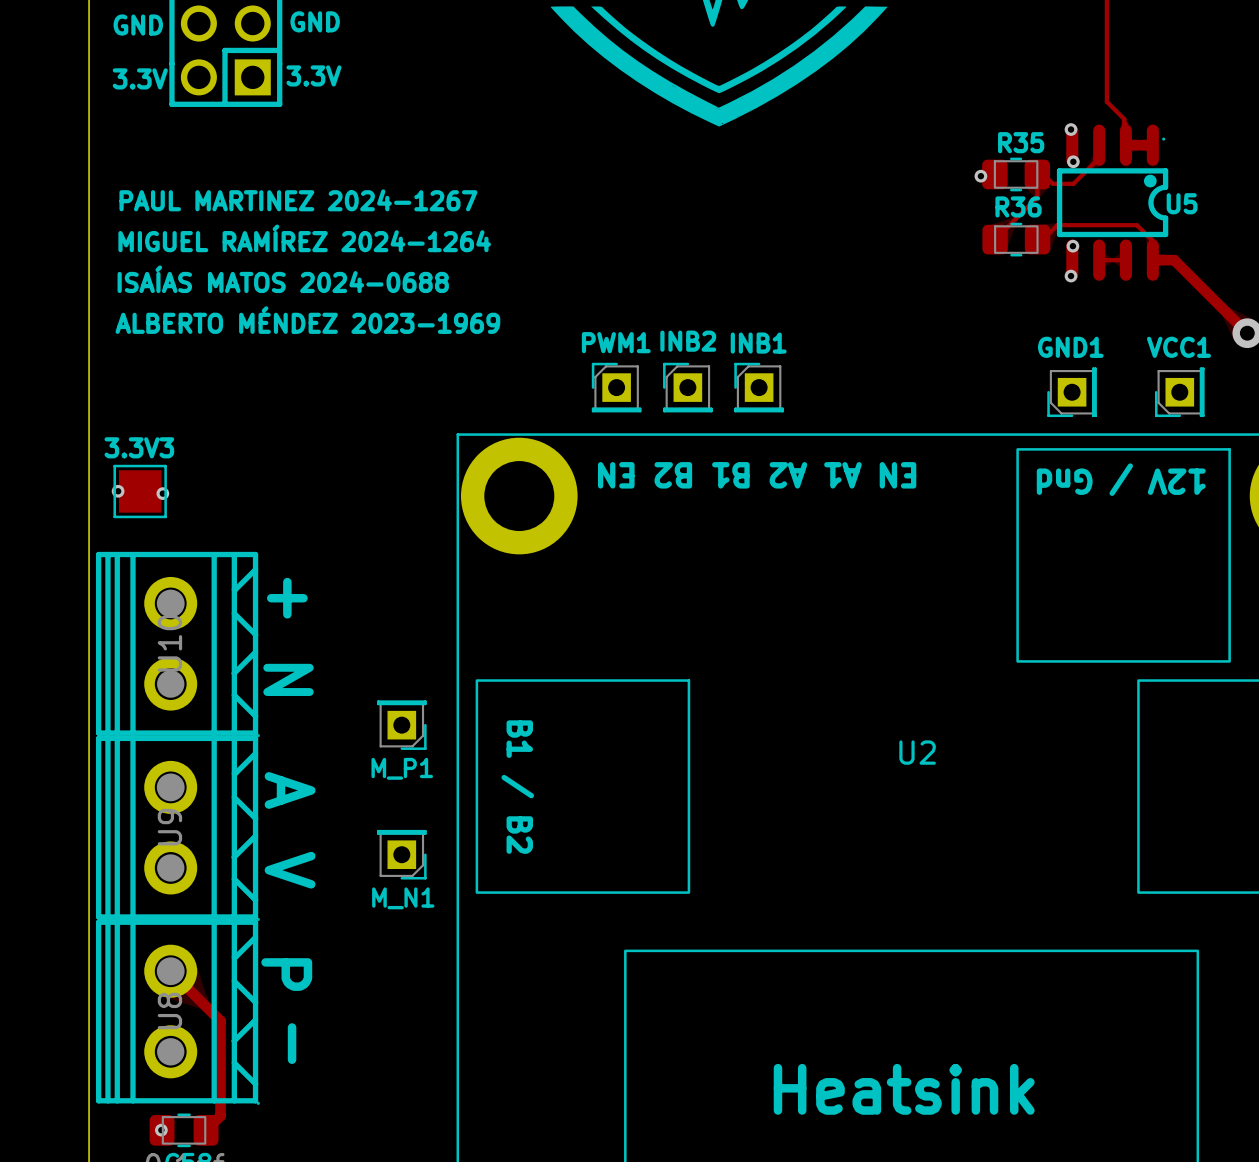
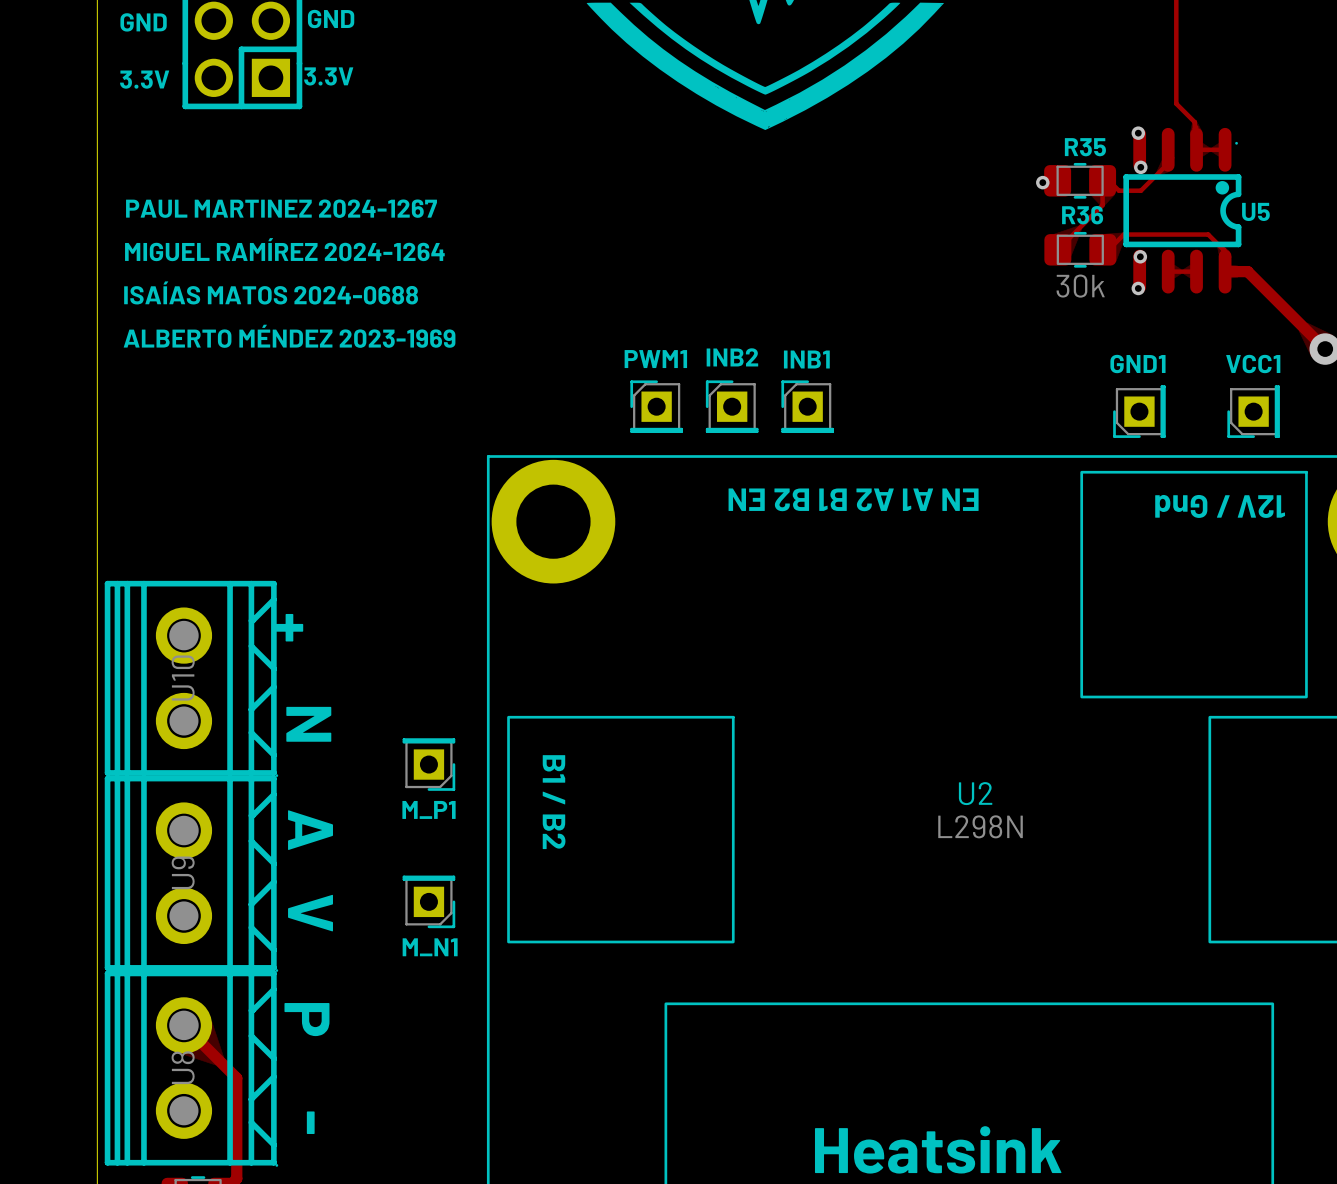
track width: thick (1125, 145) (1152, 145) -> thin (1196, 149) (1225, 149)
R36 value: none -> 30k (1080, 286)
via: (118, 491) -> none
3.3V3: (140, 491) -> none
via: (162, 493) -> none
U2 value: none -> L298N (980, 826)

